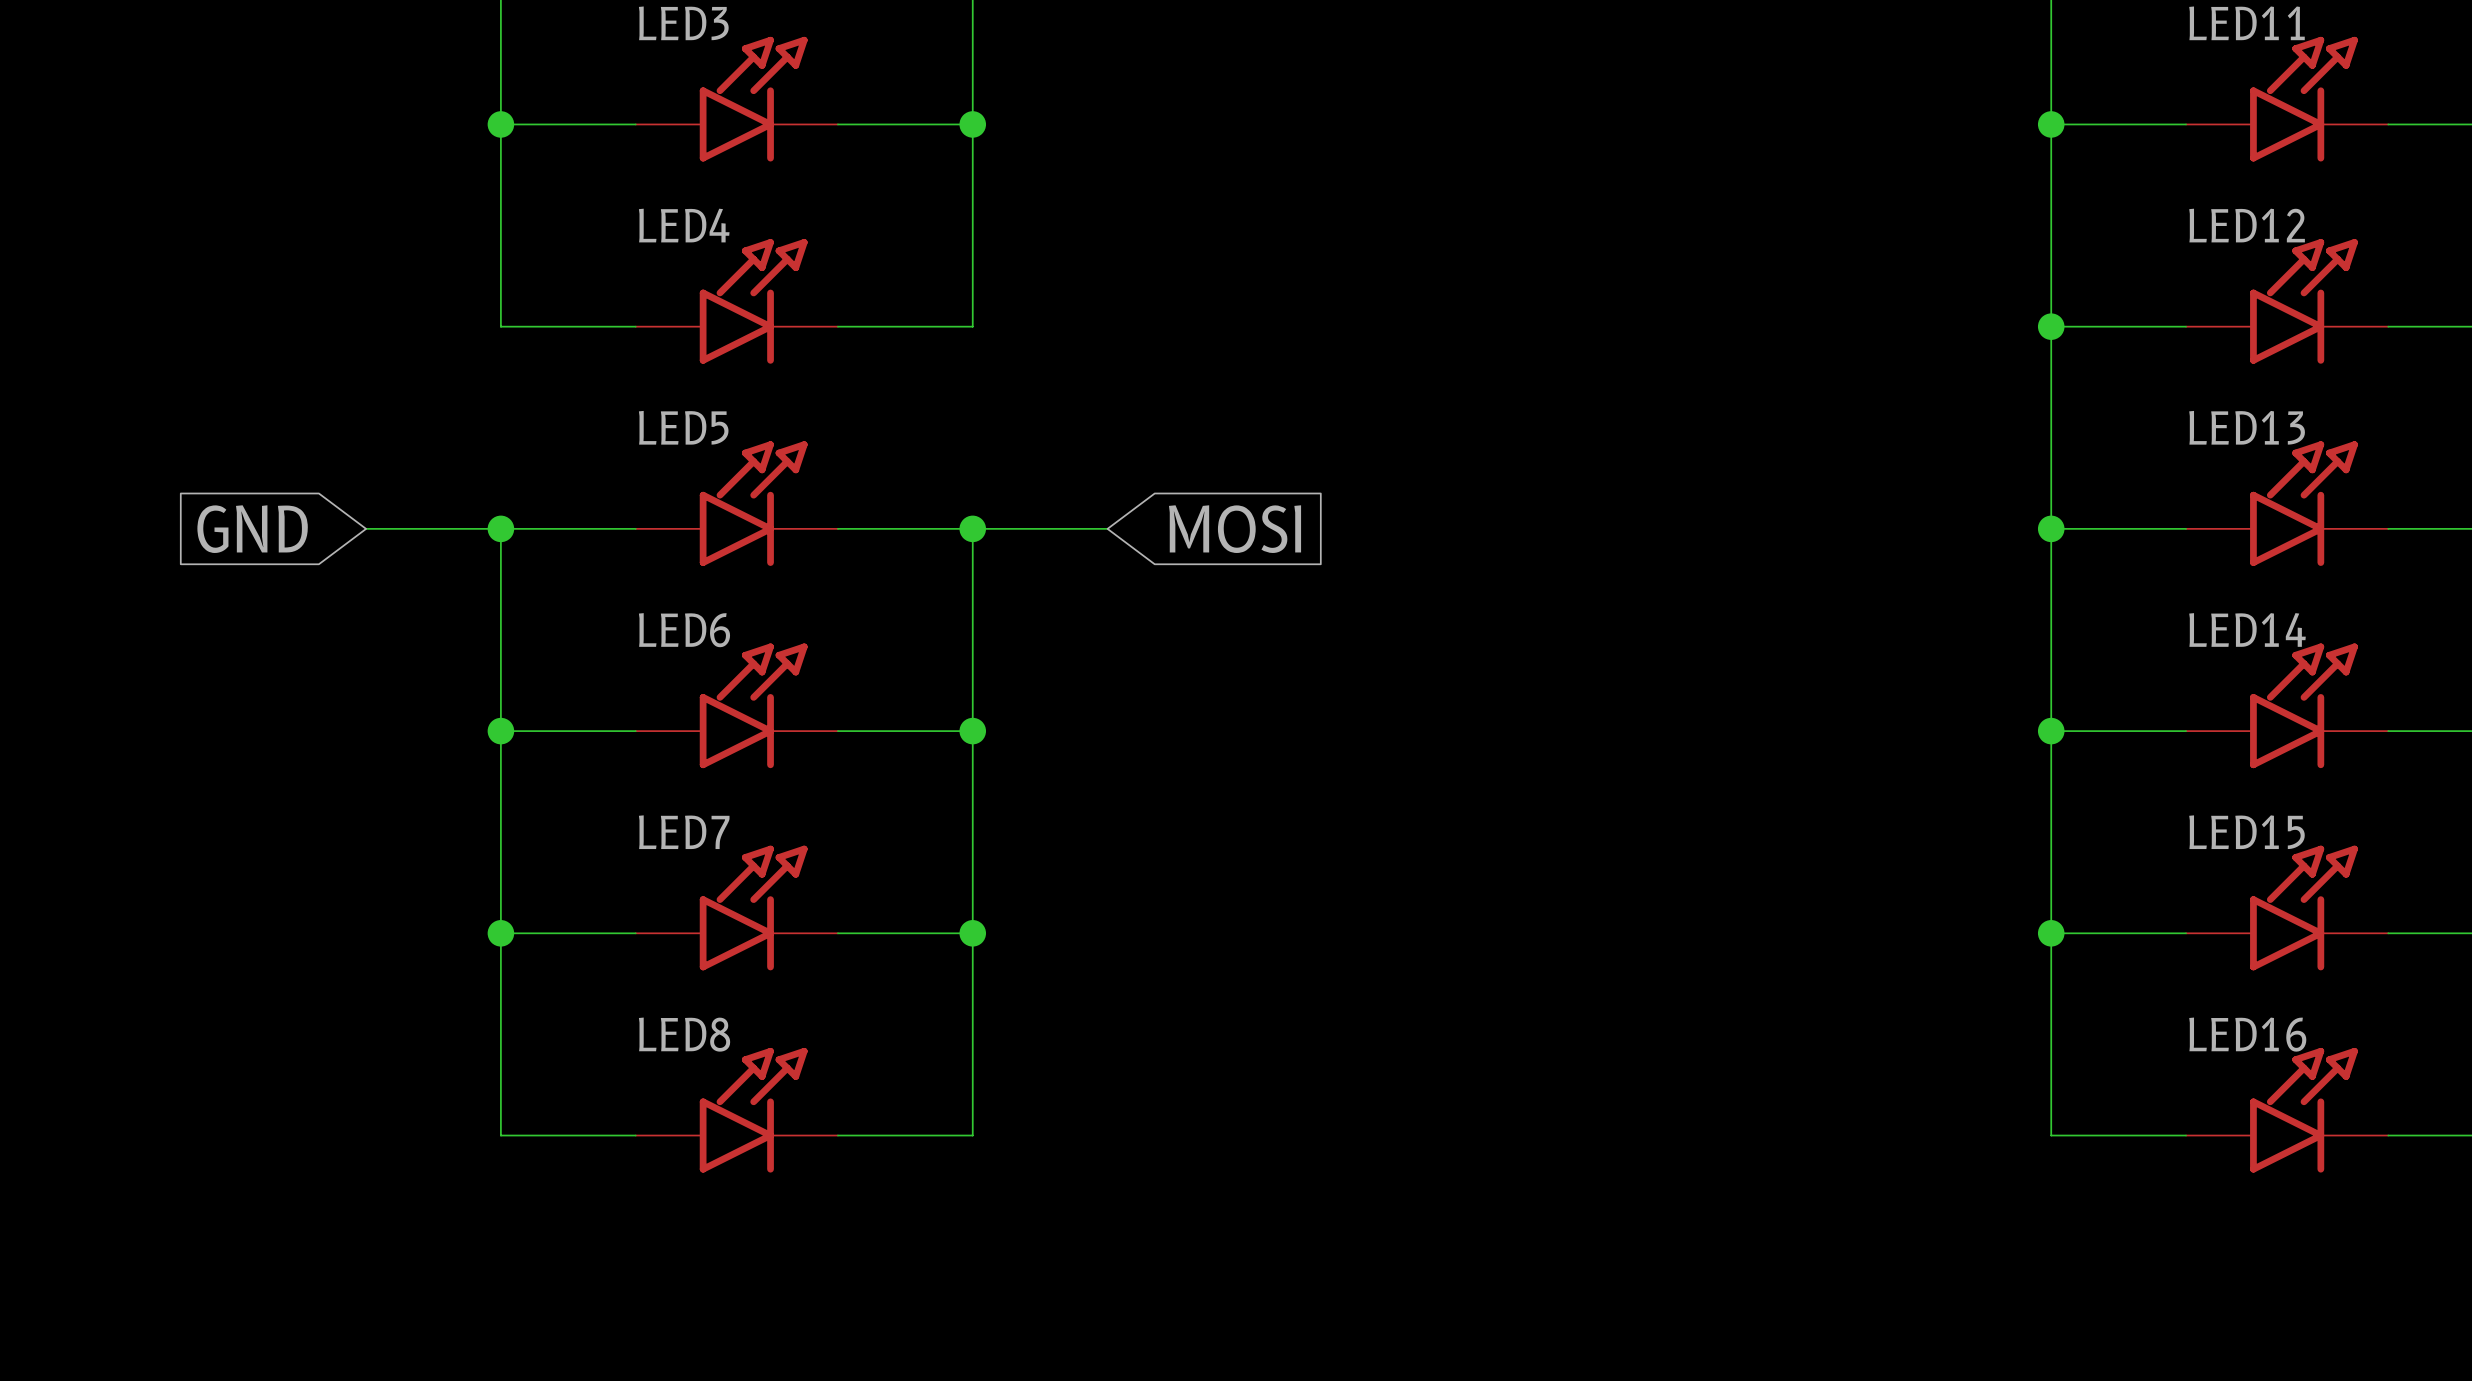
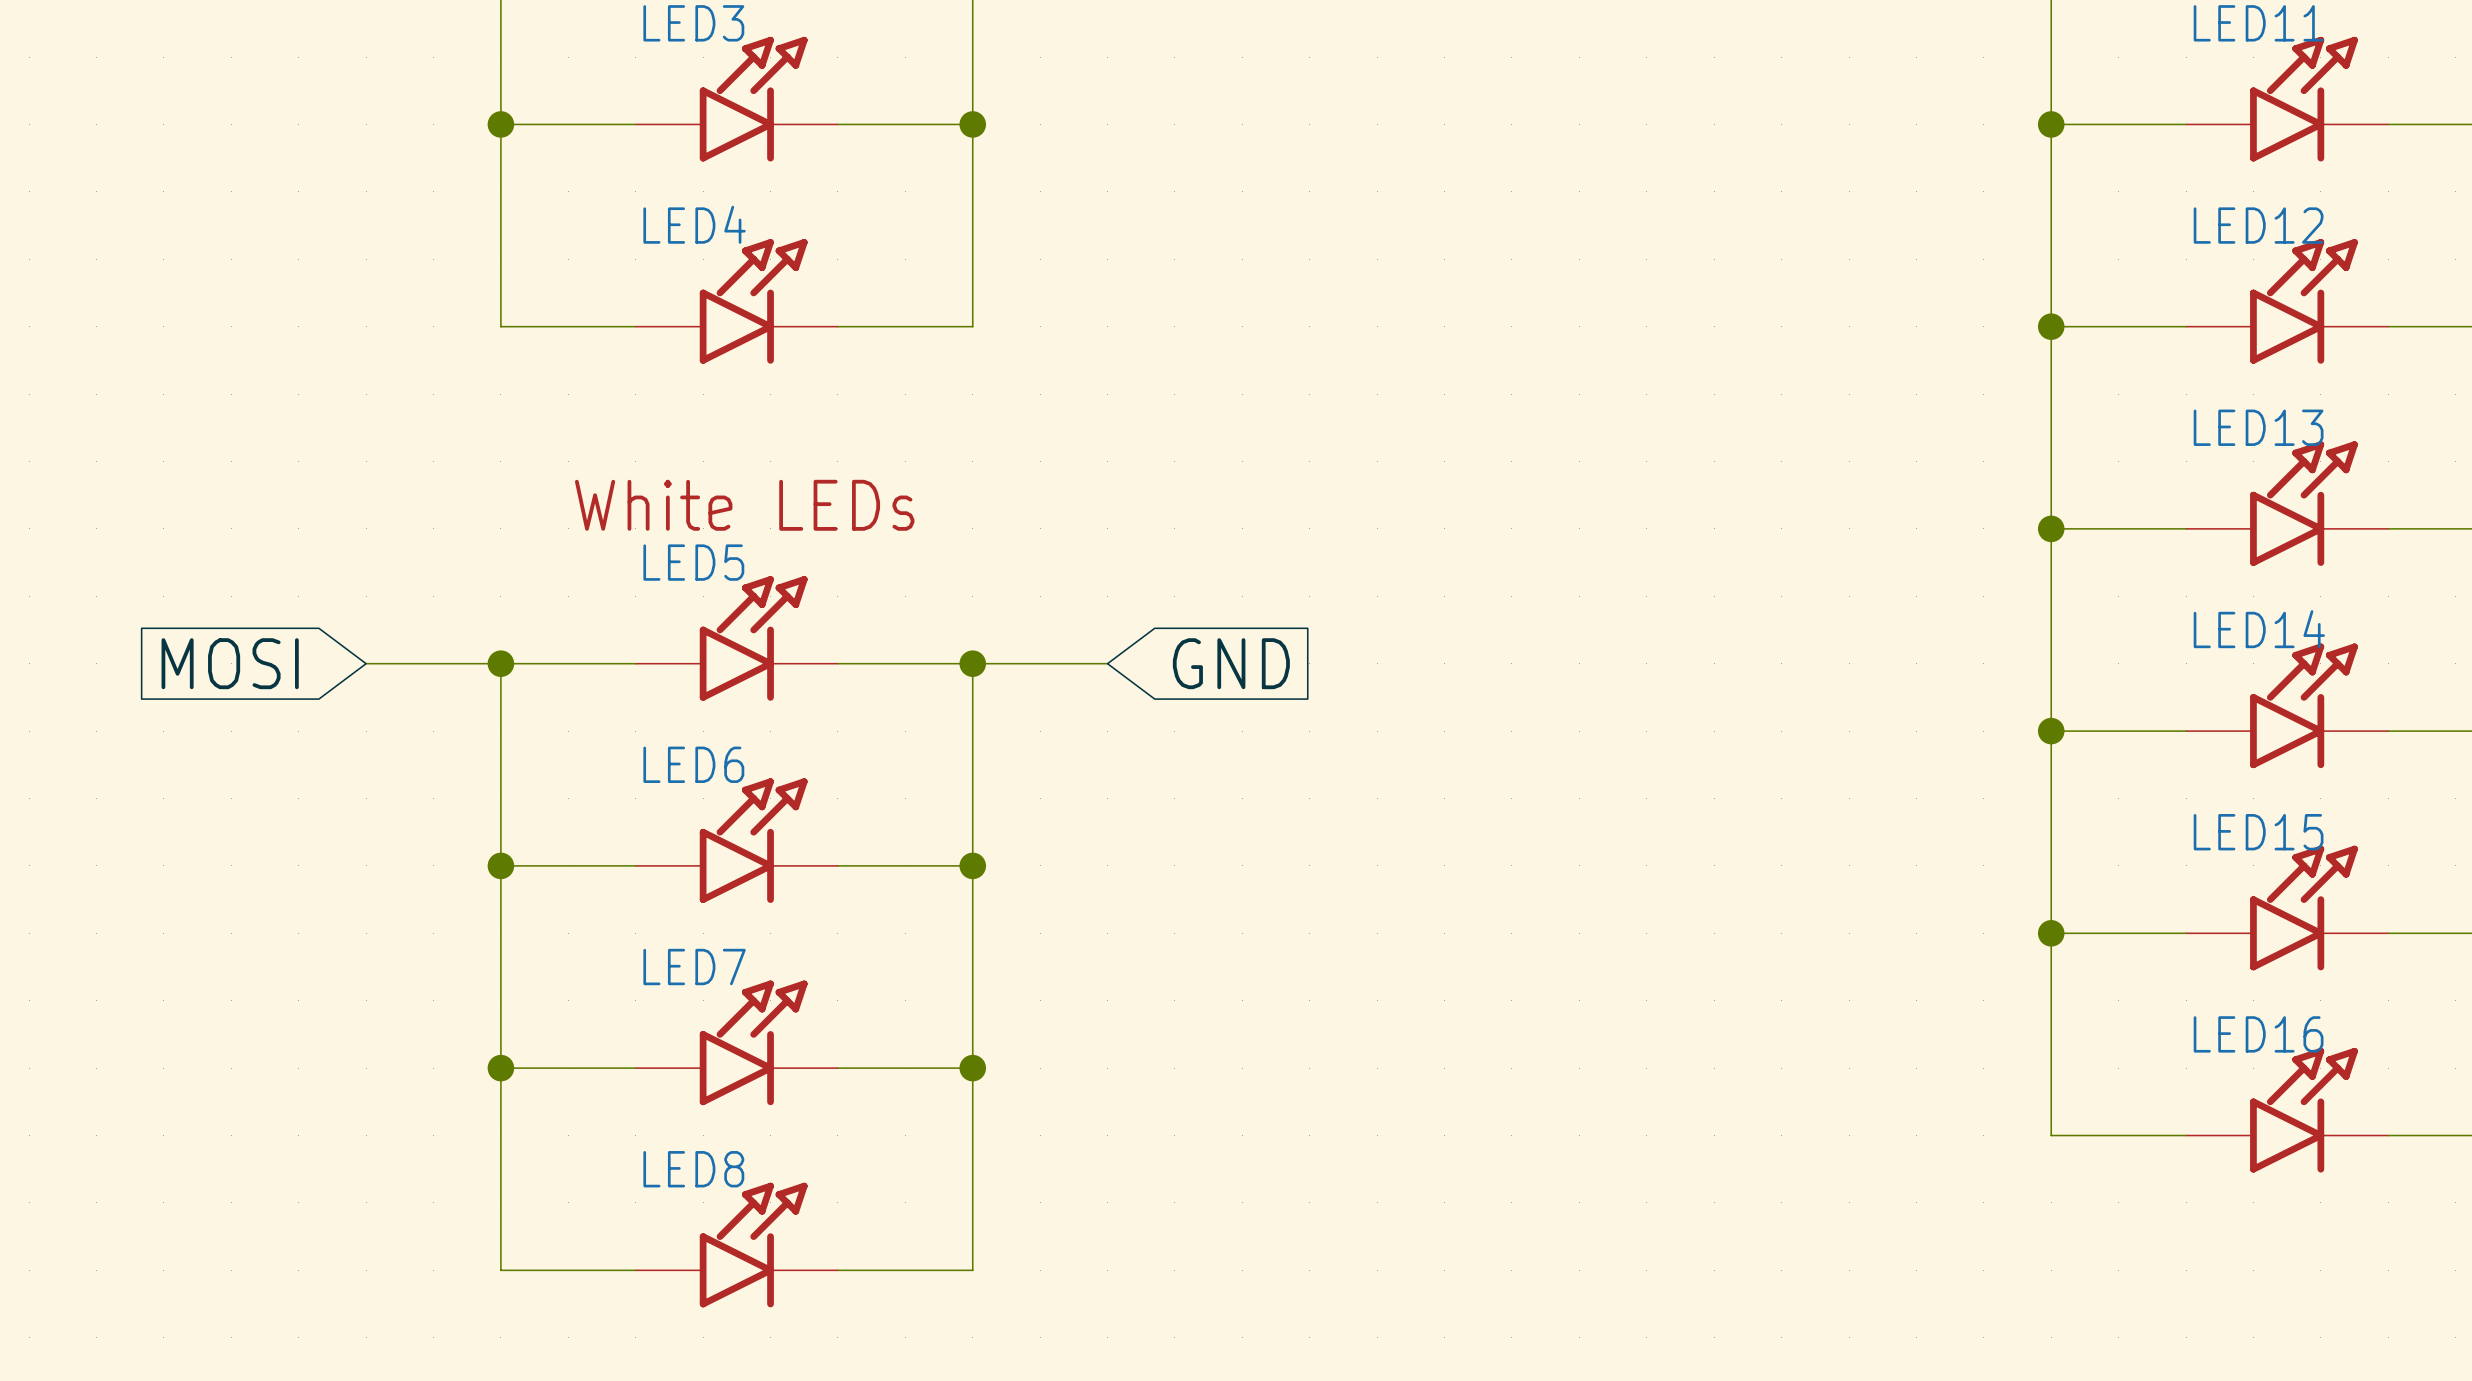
text: none -> White LEDs (744, 505)
LED5 position: (736, 503) -> (736, 638)
wire: (366, 528) (635, 528) -> (366, 663) (635, 663)
wire: (500, 528) (500, 663) -> none
junction: (500, 528) -> none
wire: (837, 528) (1107, 528) -> (837, 663) (1107, 663)
wire: (972, 528) (972, 663) -> none
junction: (972, 528) -> none
global label: GND (252, 529) -> none
global label: MOSI (1235, 529) -> none
global label: none -> MOSI (230, 663)
junction: none -> (500, 663)
junction: none -> (972, 663)
global label: none -> GND (1231, 663)
LED6 position: (736, 705) -> (736, 840)
wire: (500, 731) (635, 731) -> (500, 865) (635, 865)
junction: (500, 731) -> none
wire: (837, 731) (972, 731) -> (837, 865) (972, 865)
junction: (972, 731) -> none
junction: none -> (500, 865)
junction: none -> (972, 865)
LED7 position: (736, 908) -> (736, 1042)
wire: (500, 933) (635, 933) -> (500, 1068) (635, 1068)
junction: (500, 933) -> none
wire: (837, 933) (972, 933) -> (837, 1068) (972, 1068)
junction: (972, 933) -> none
junction: none -> (500, 1068)
junction: none -> (972, 1068)
LED8 position: (736, 1110) -> (736, 1245)
wire: (500, 1135) (635, 1135) -> (500, 1135) (500, 1270) (635, 1270)
wire: (837, 1135) (972, 1135) -> (837, 1270) (972, 1270) (972, 1135)

